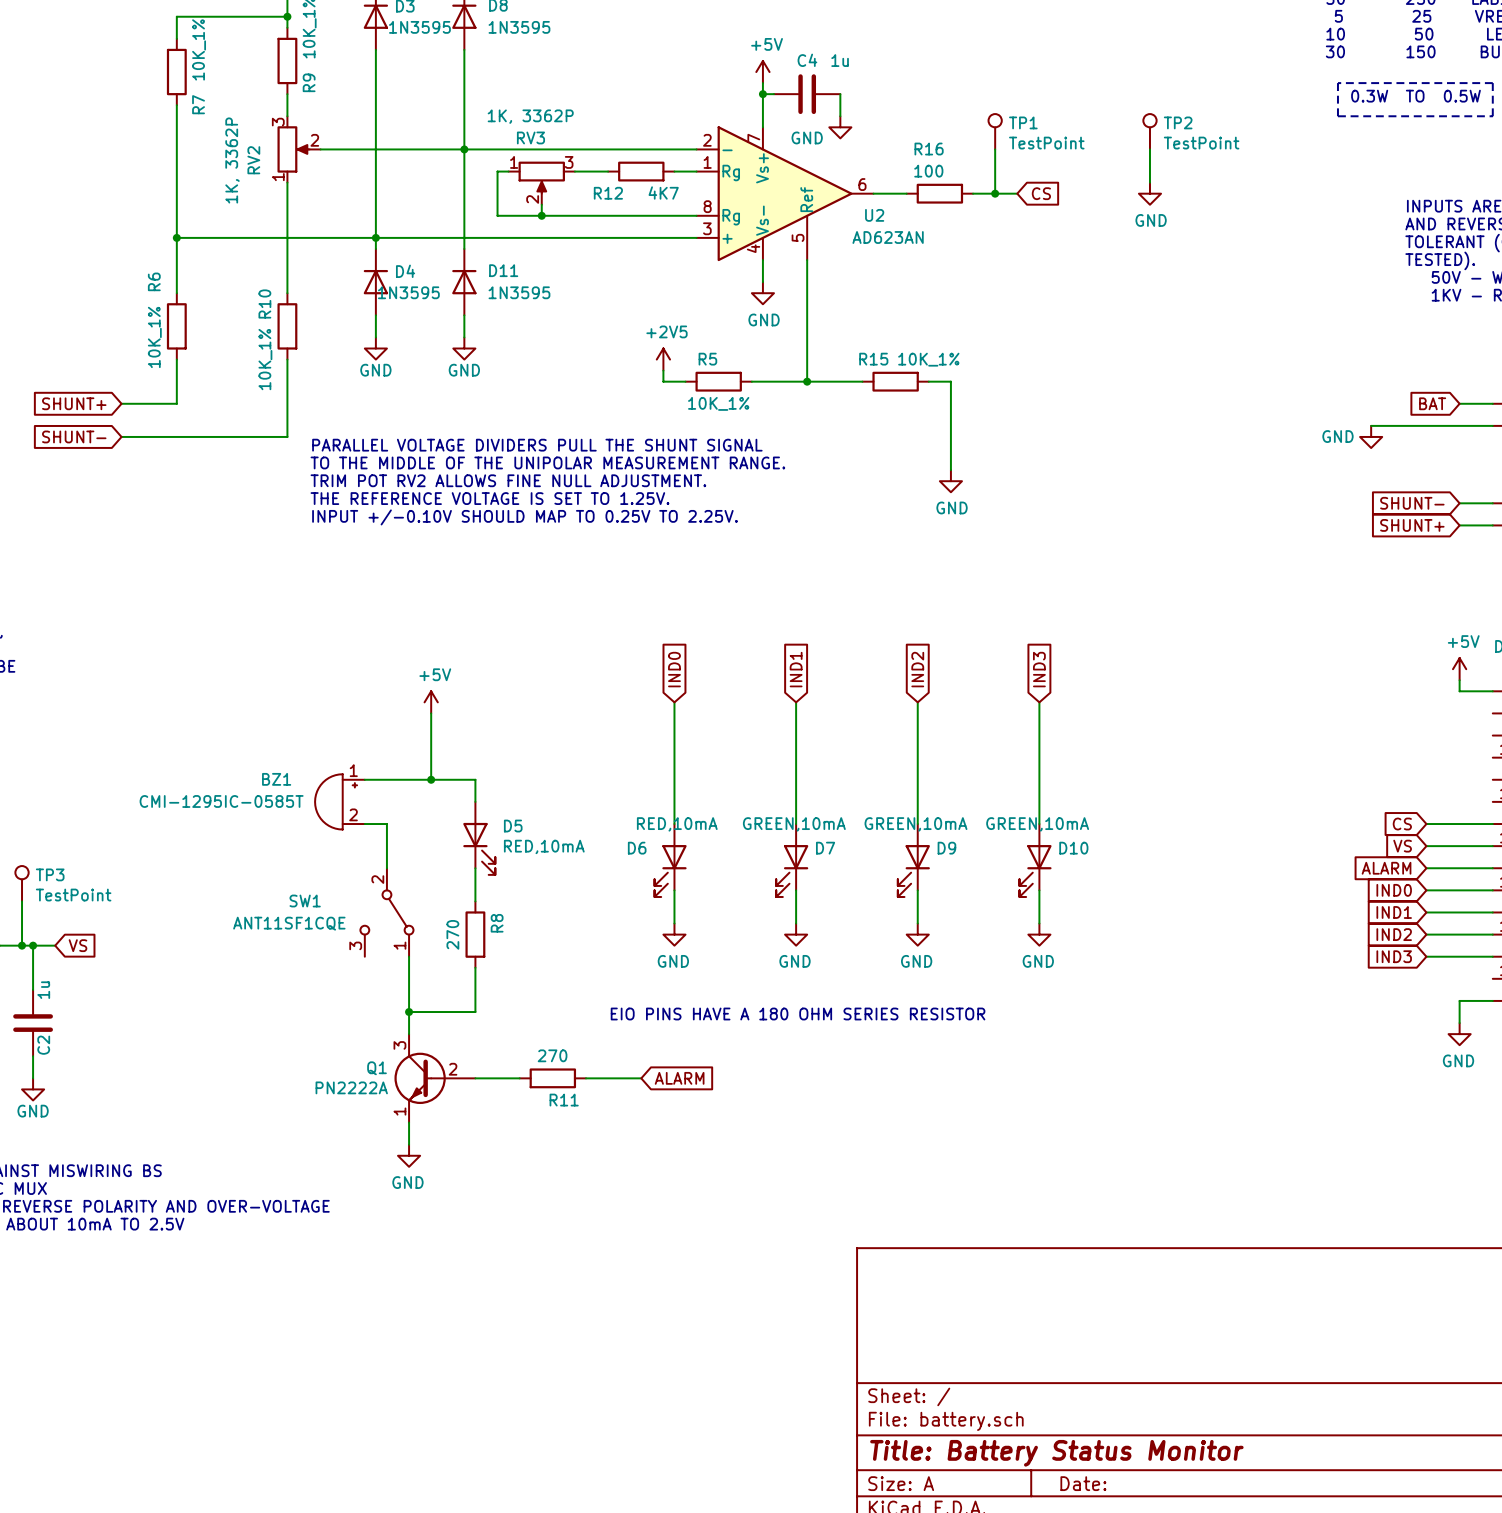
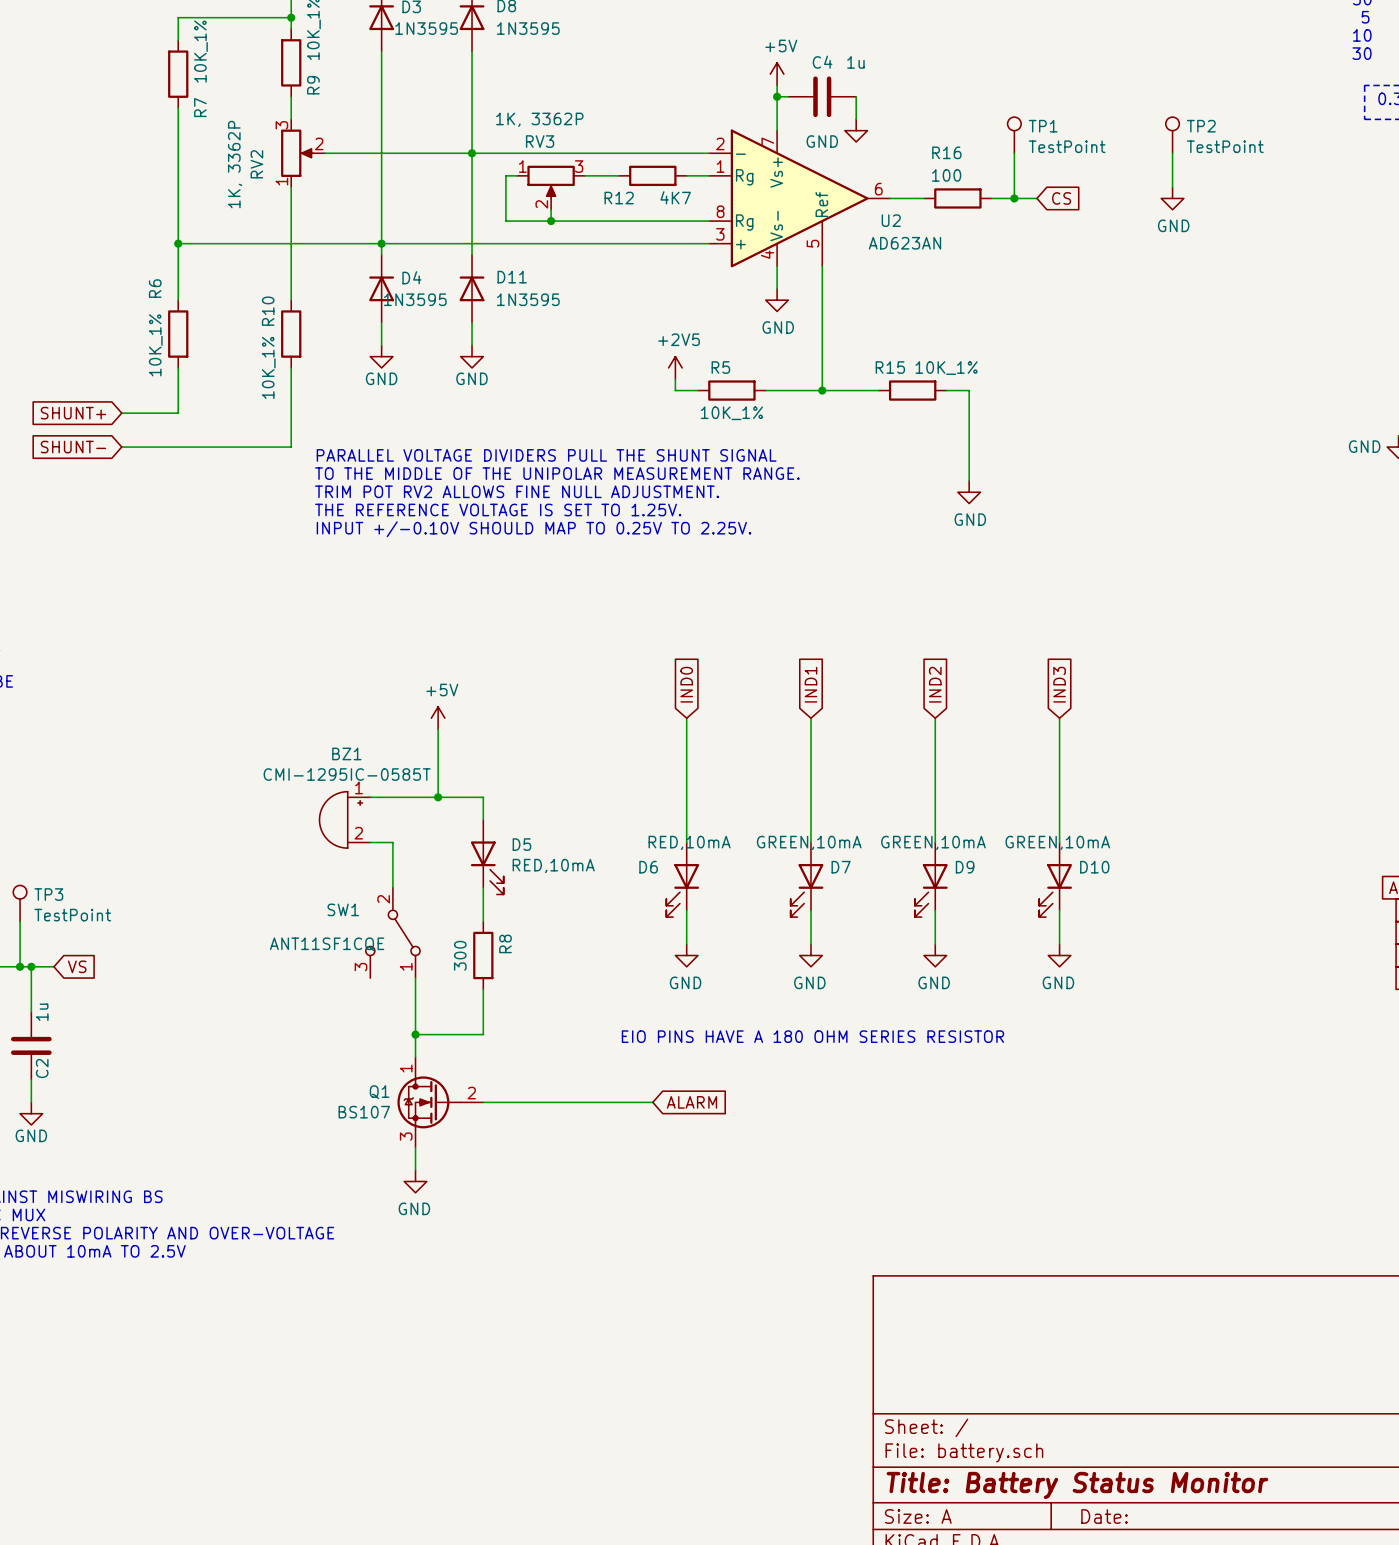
BZ1 name position: BZ1 (276, 779) -> BZ1 (346, 753)
BZ1 value position: CMI-1295IC-0585T (221, 801) -> CMI-1295IC-0585T (347, 774)
SW1 name position: SW1 (305, 901) -> SW1 (343, 909)
SW1 value position: ANT11SF1CQE (289, 923) -> ANT11SF1CQE (327, 944)
R8 value: 270 (452, 934) -> 300 (460, 955)
Q1 symbol: [394, 1034, 476, 1123] -> [397, 1057, 484, 1148]
wire: none -> (528, 1102) (596, 1102)
R11: 270 (552, 1078) -> none
Q1 value: PN2222A (351, 1087) -> BS107 (364, 1112)

